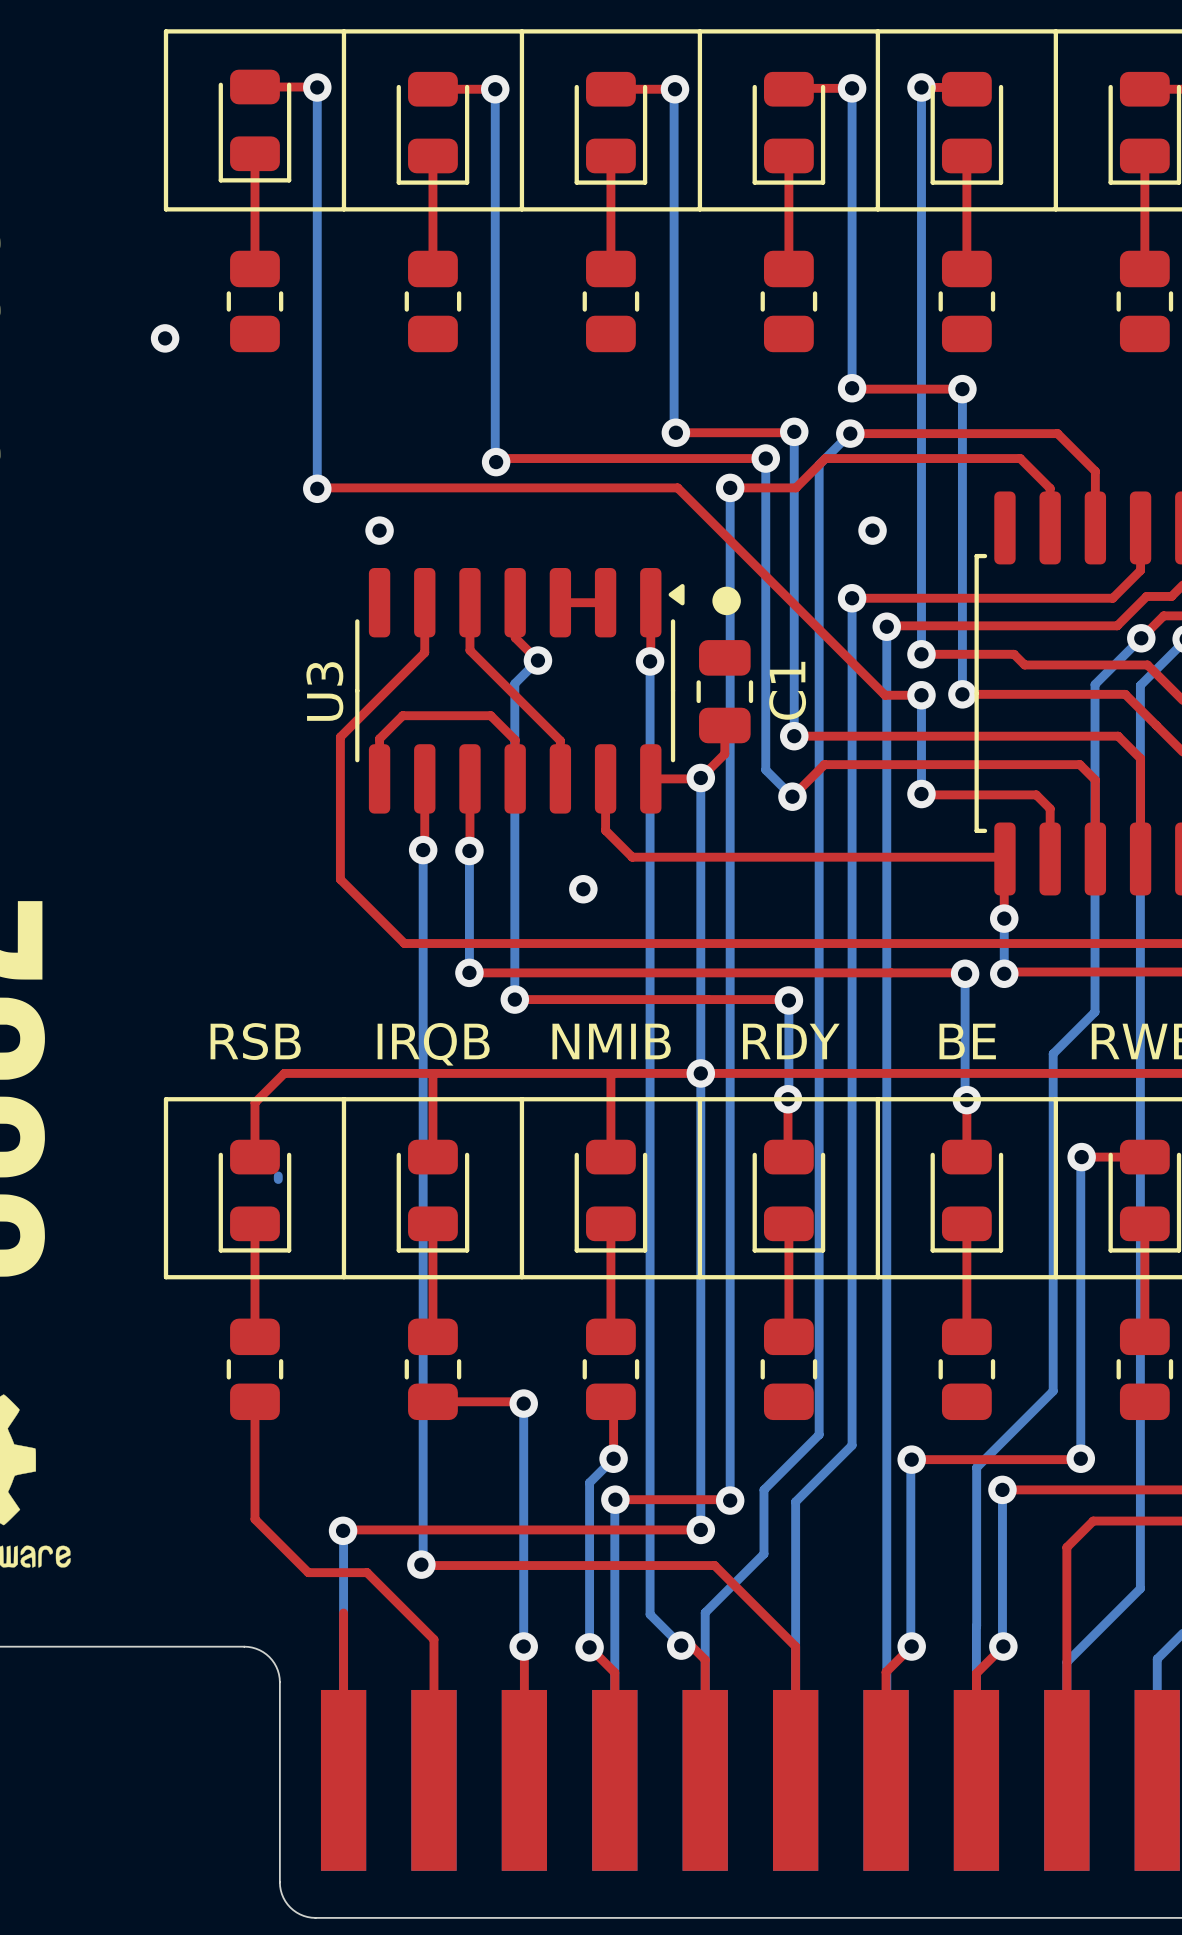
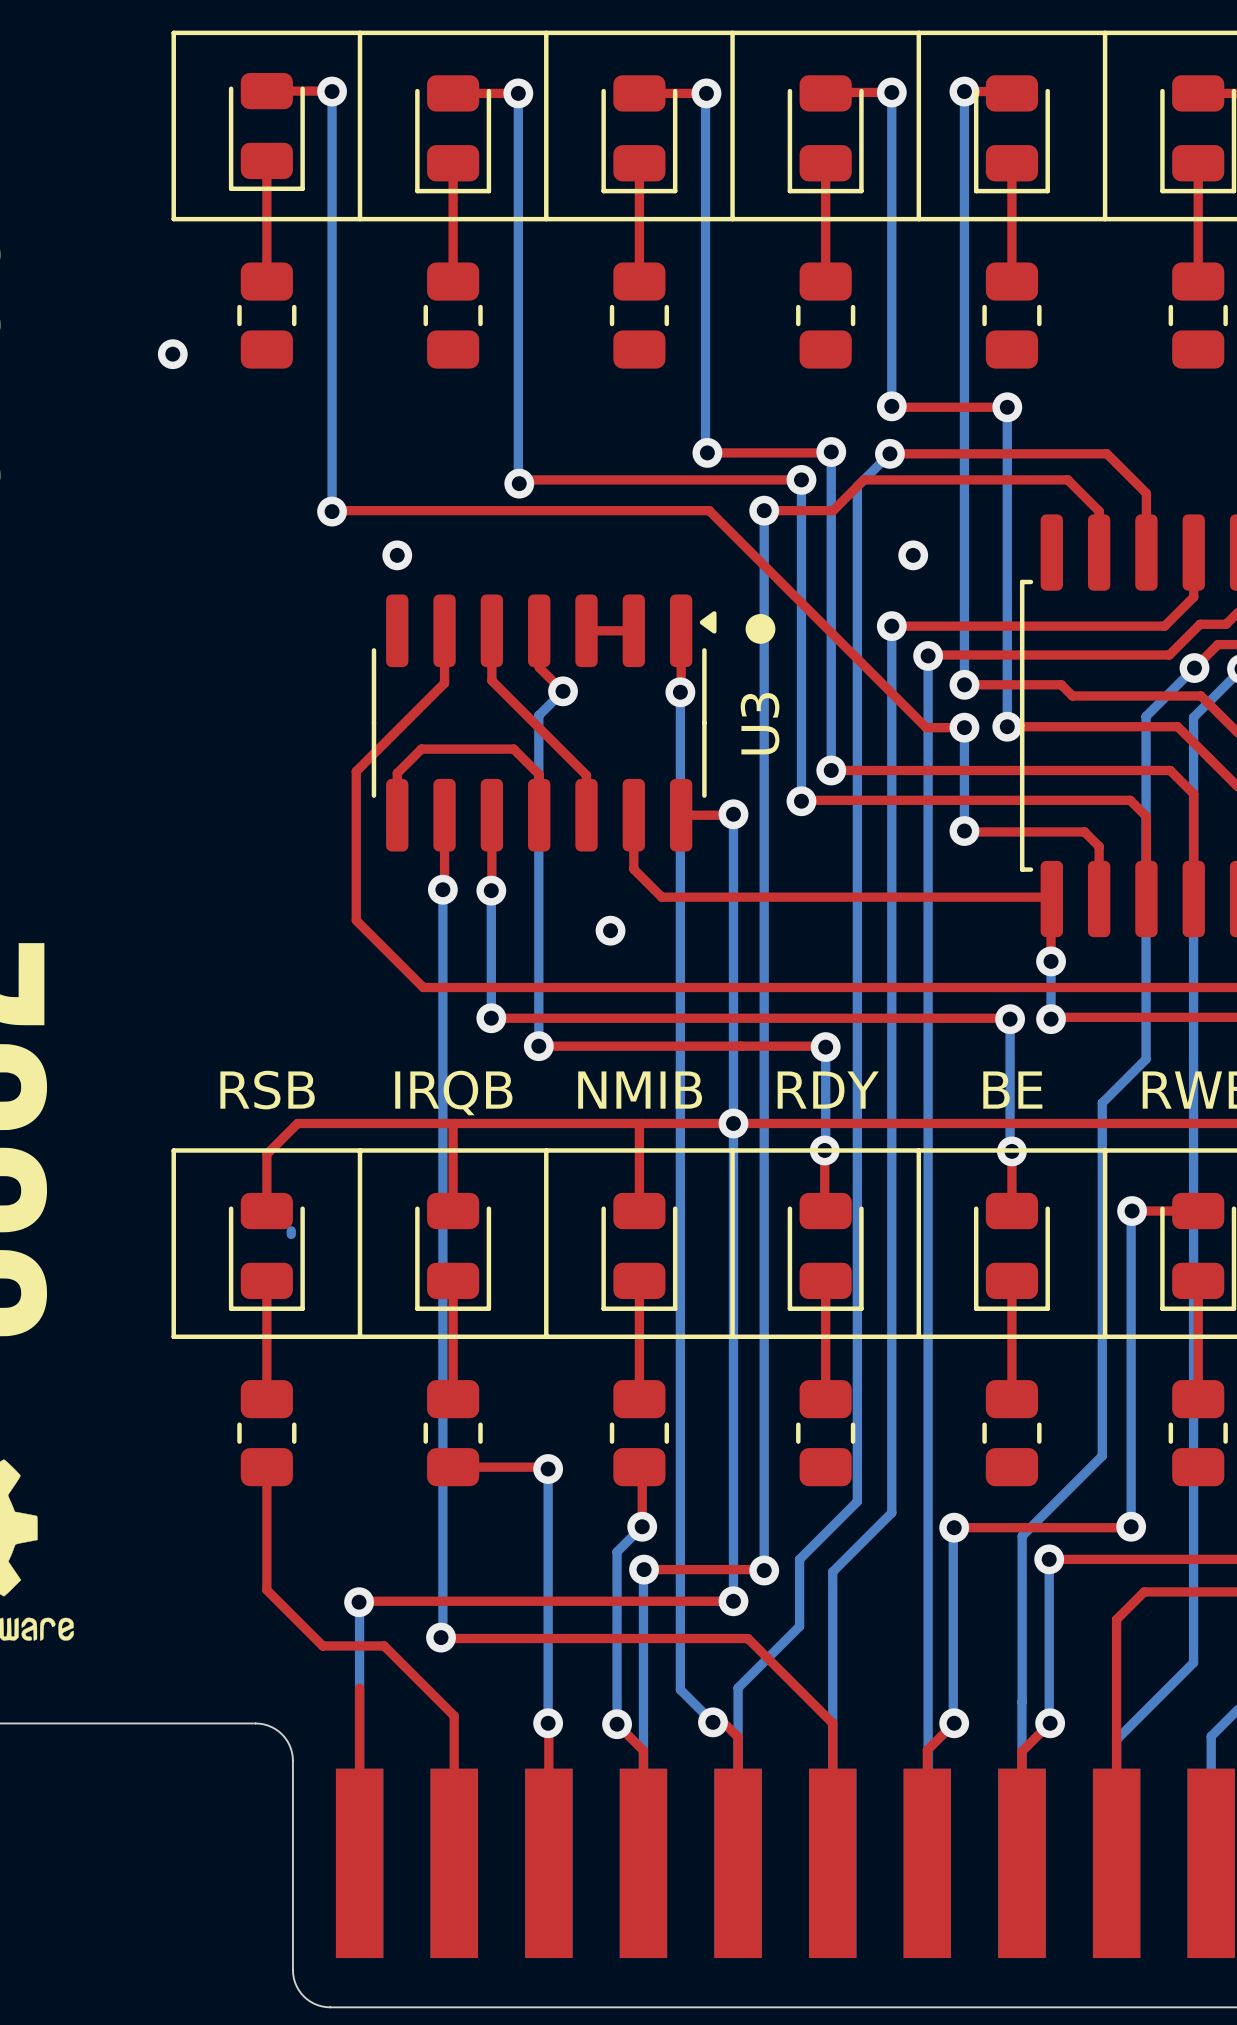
U3 name position: U3 (324, 691) -> U3 (760, 723)
C1: (724, 691) -> none
top track: (724, 725) (724, 753) (700, 778) -> none
top track: (824, 764) (792, 796) -> (862, 800) (801, 801)
bottom track: (765, 765) (765, 769) (792, 796) -> none
via position: (792, 796) -> (801, 801)

